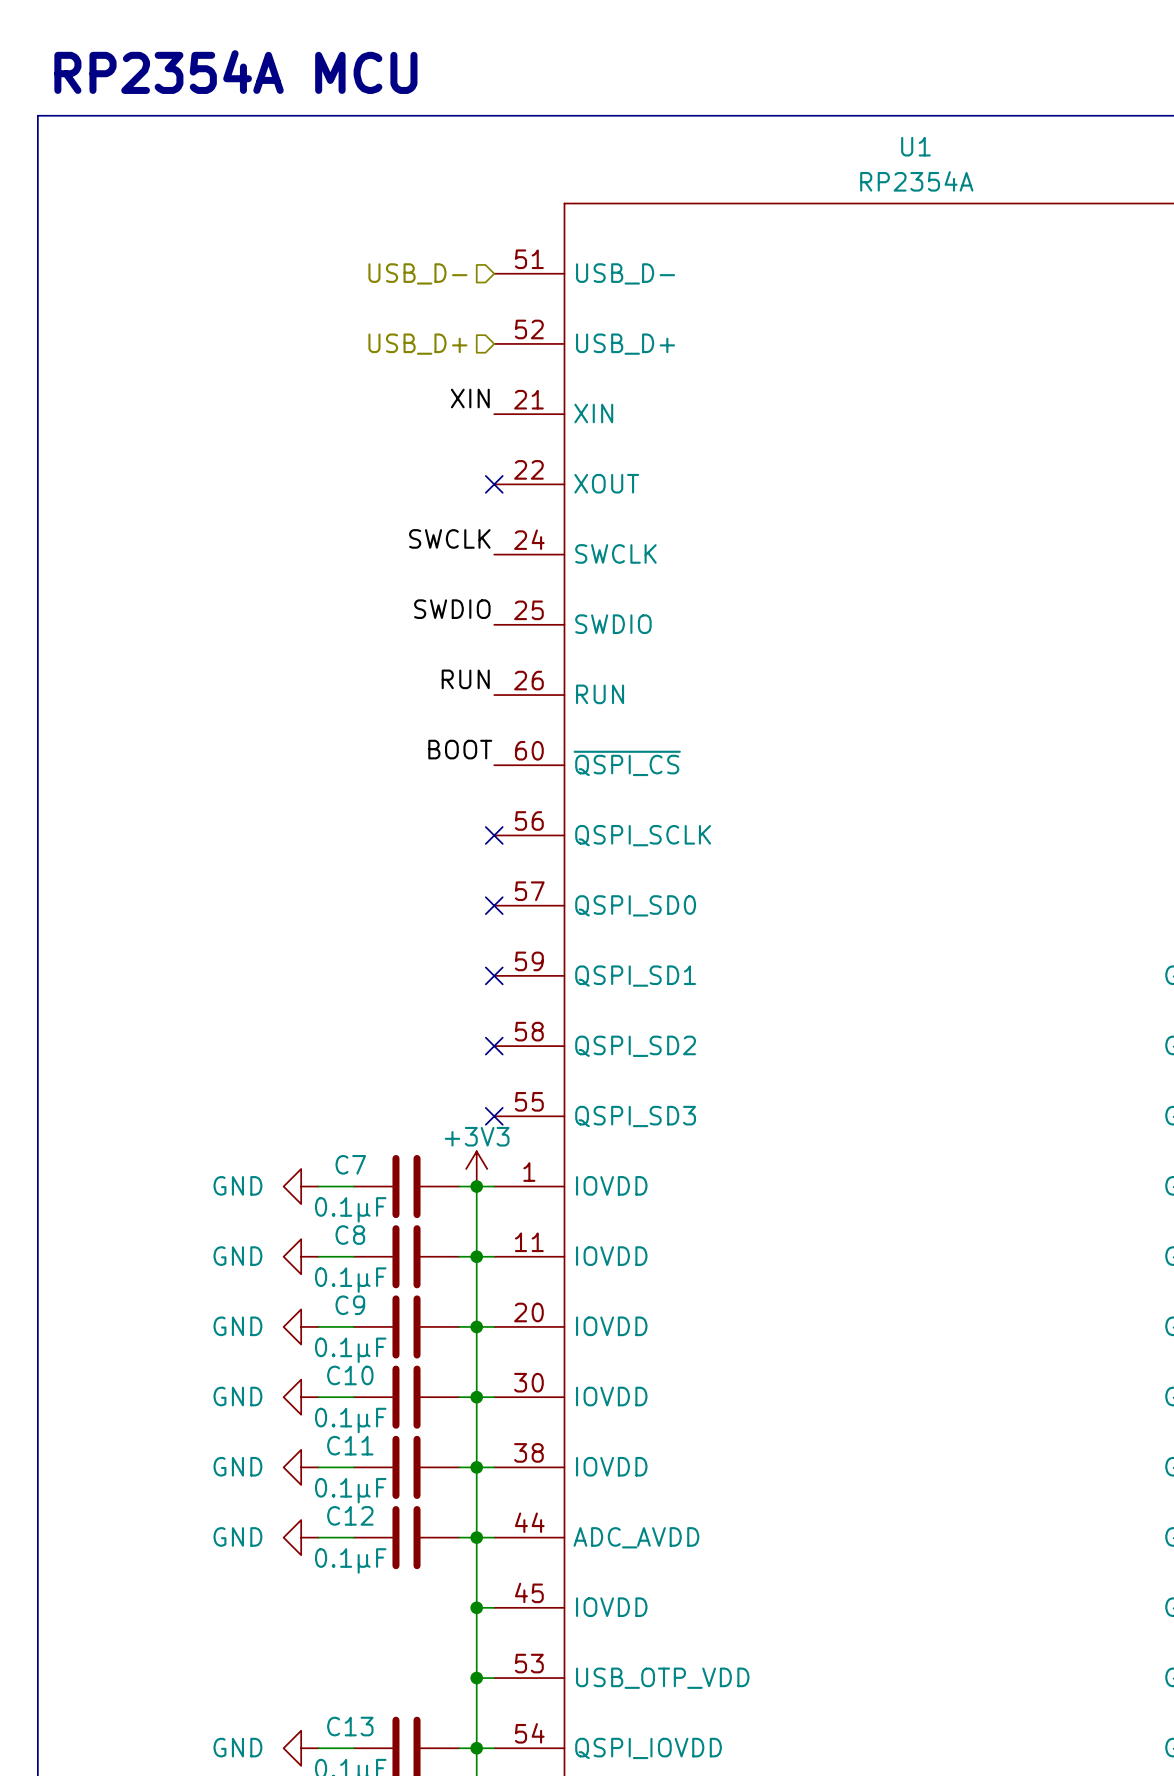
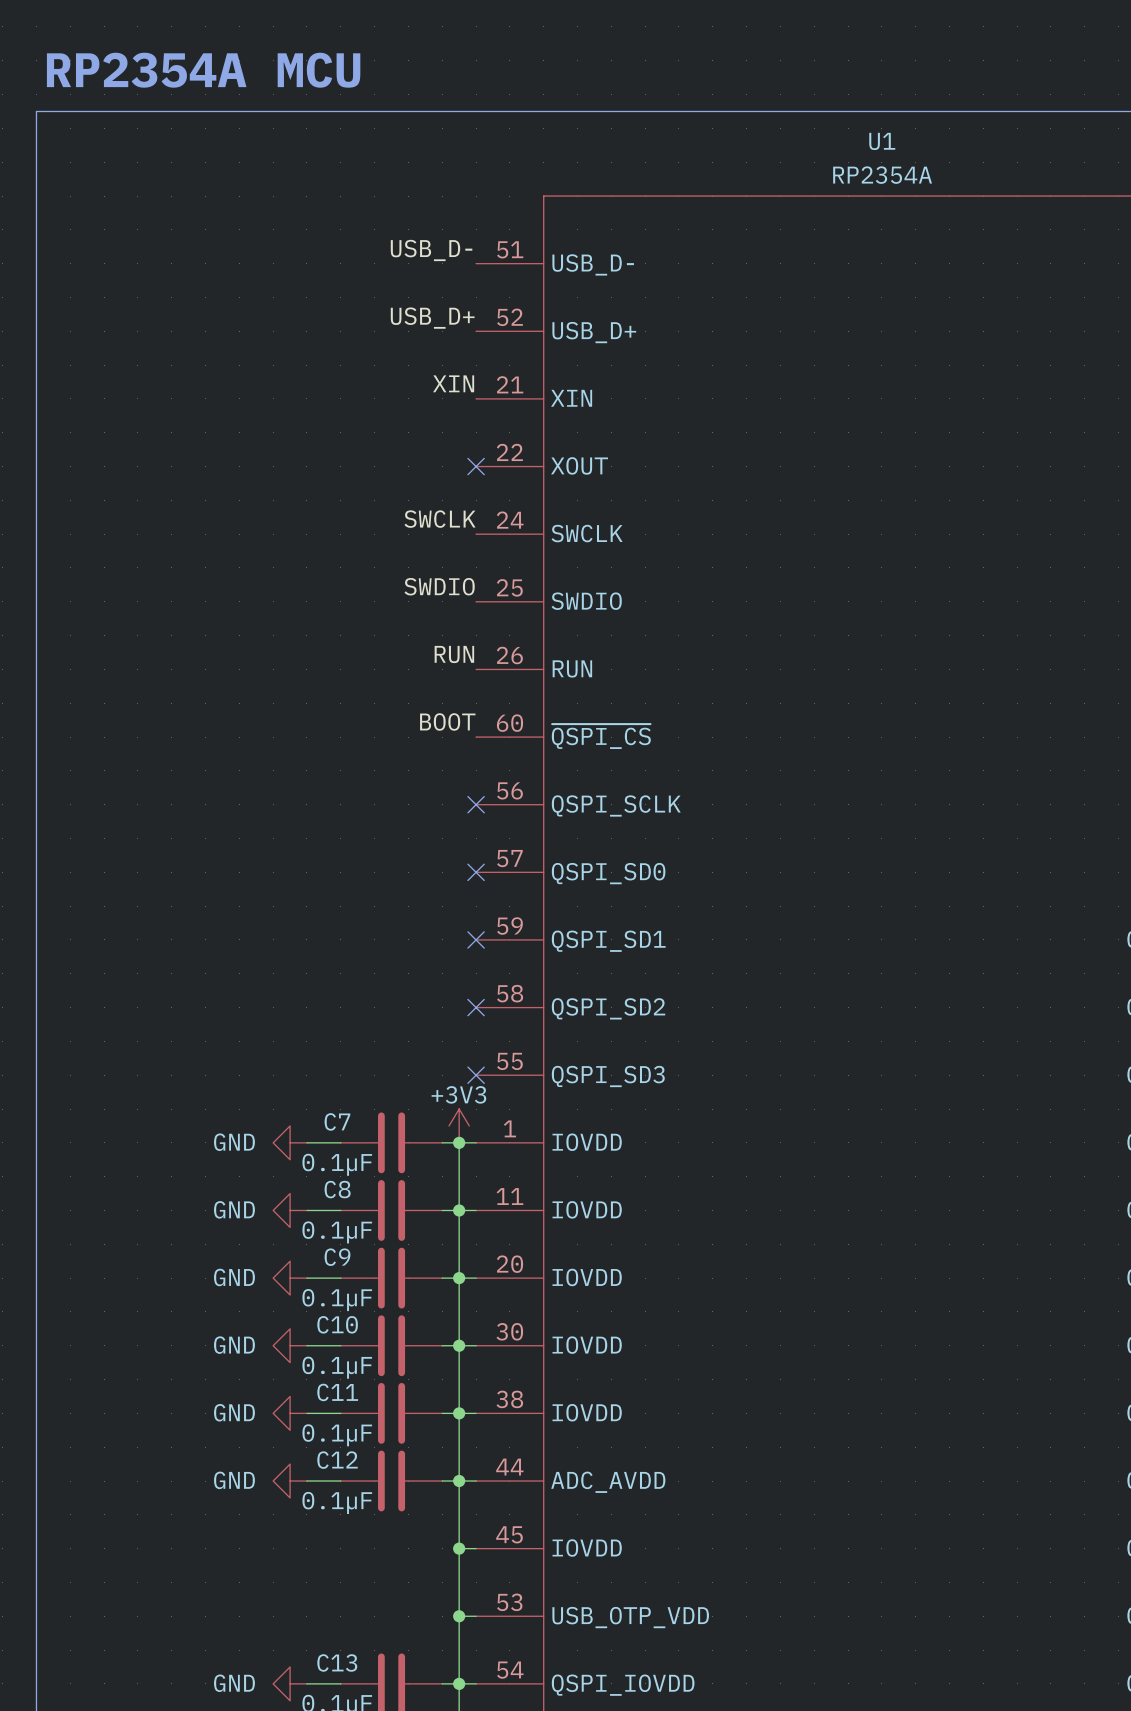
label: none -> USB_D- (431, 250)
hierarchical label: USB_D- (417, 273) -> none
label: none -> USB_D+ (432, 318)
hierarchical label: USB_D+ (417, 344) -> none

